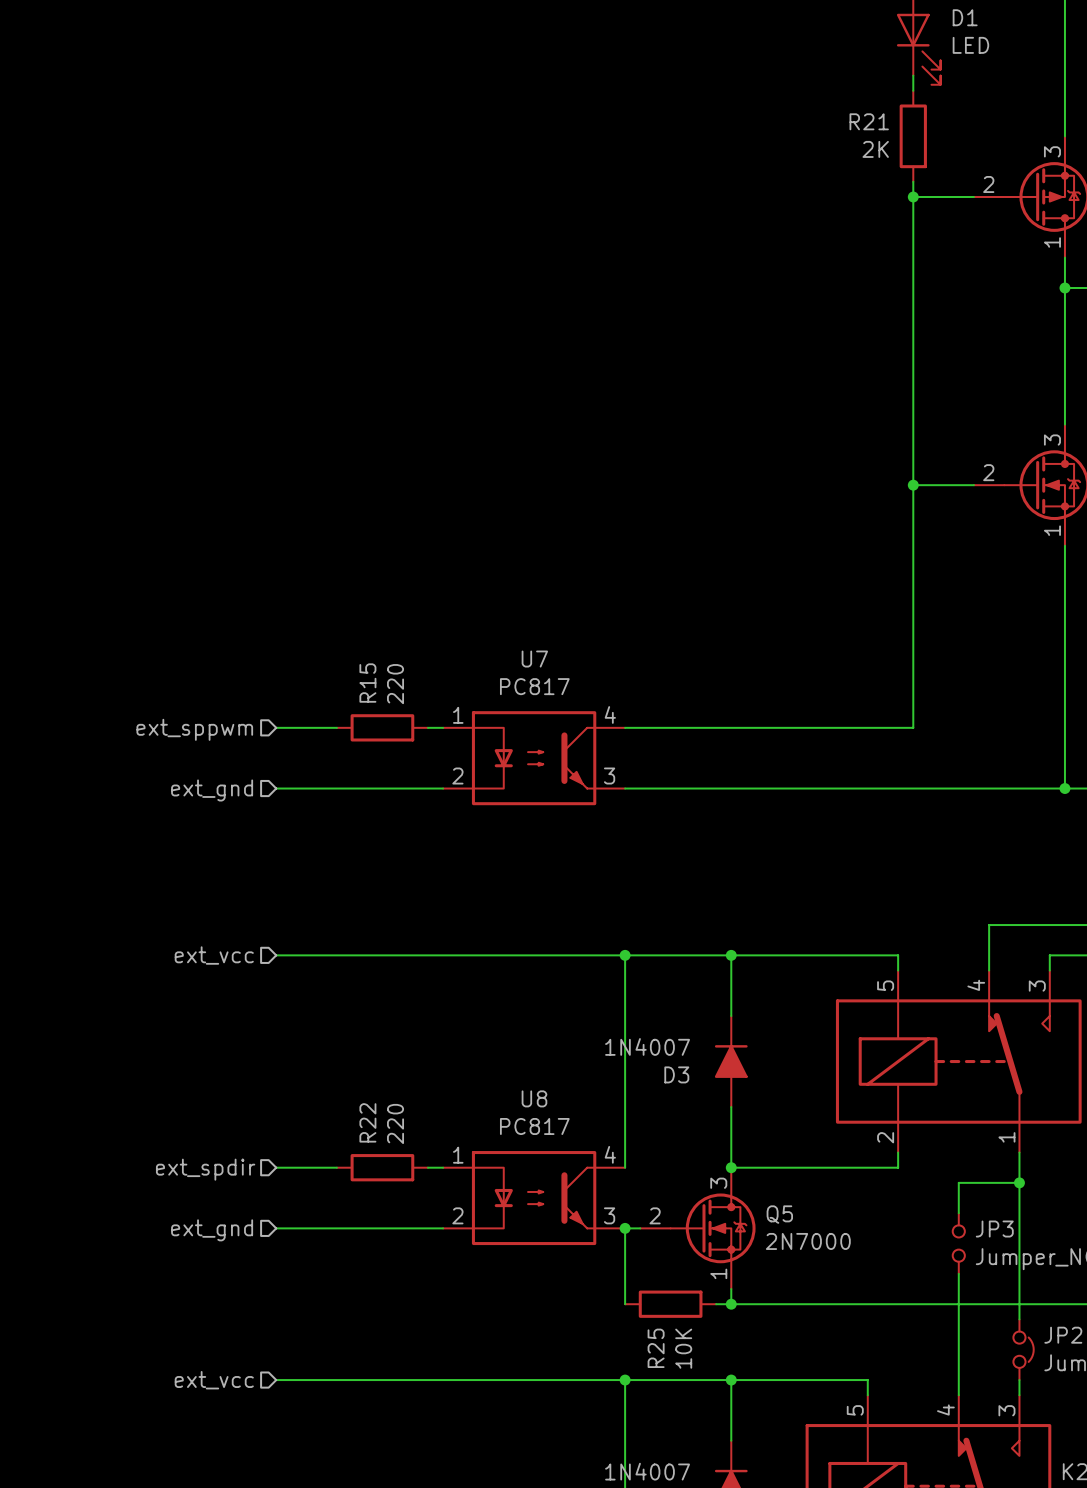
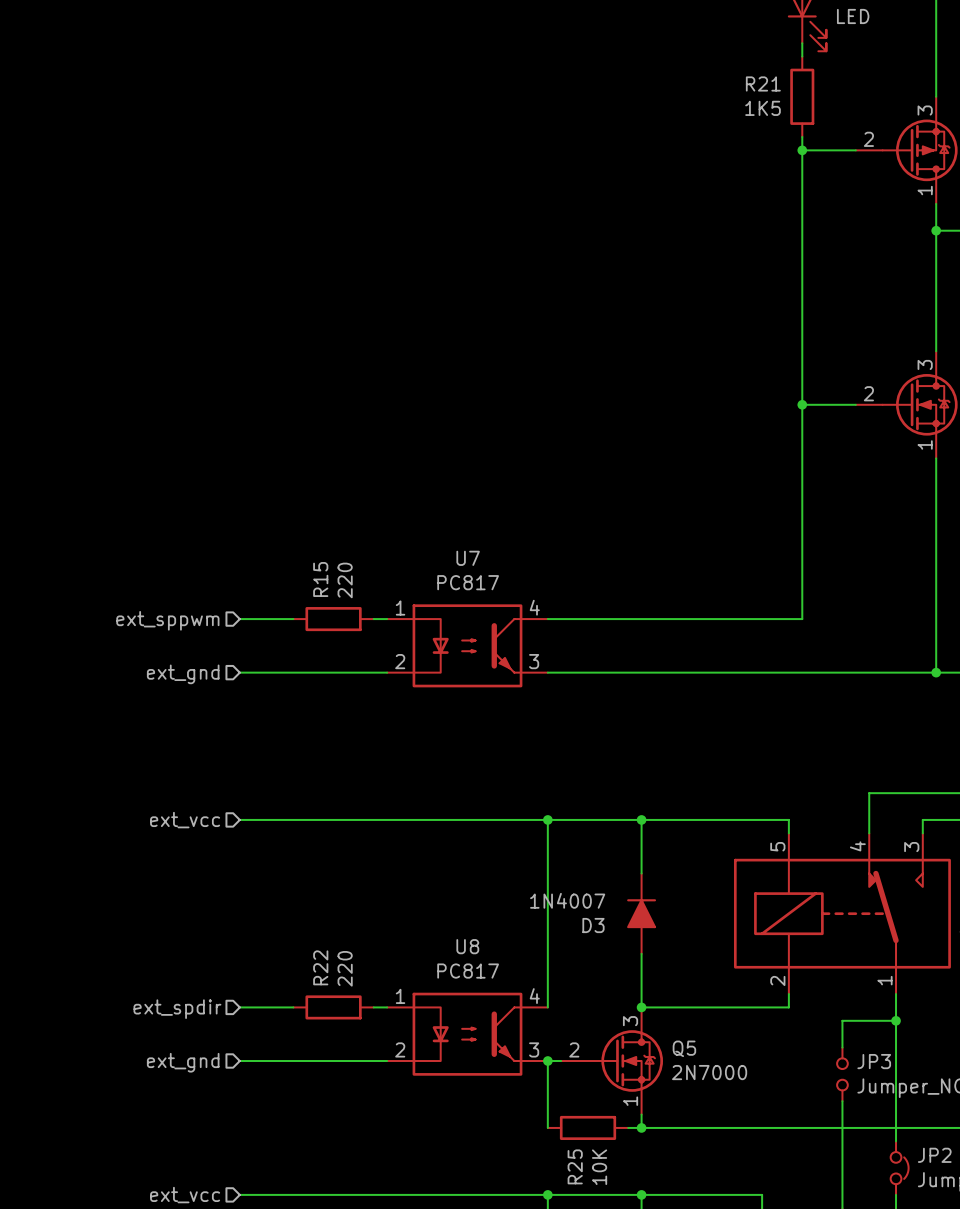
R21 value: 2K (875, 149) -> 1K5 (763, 108)

